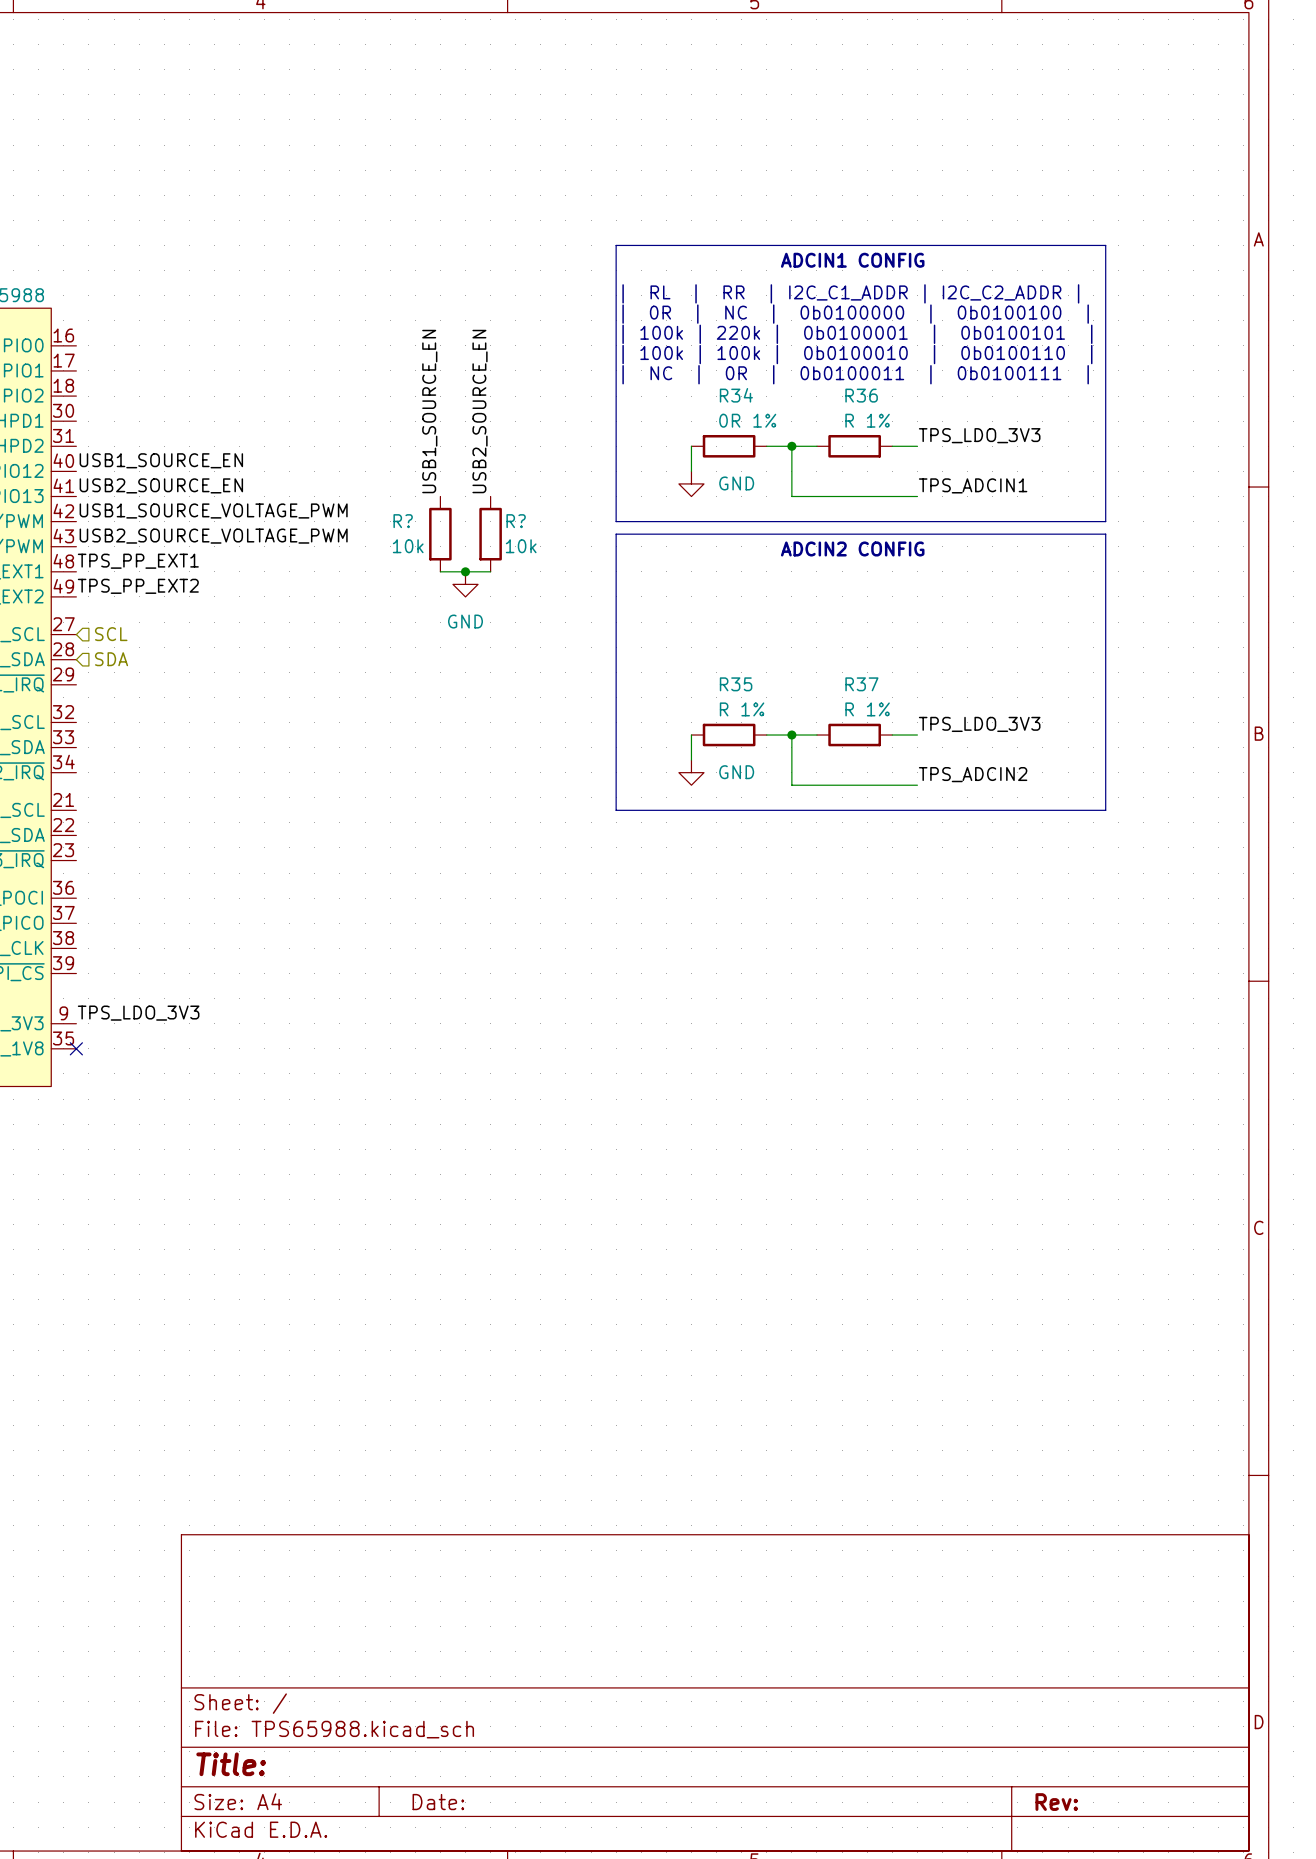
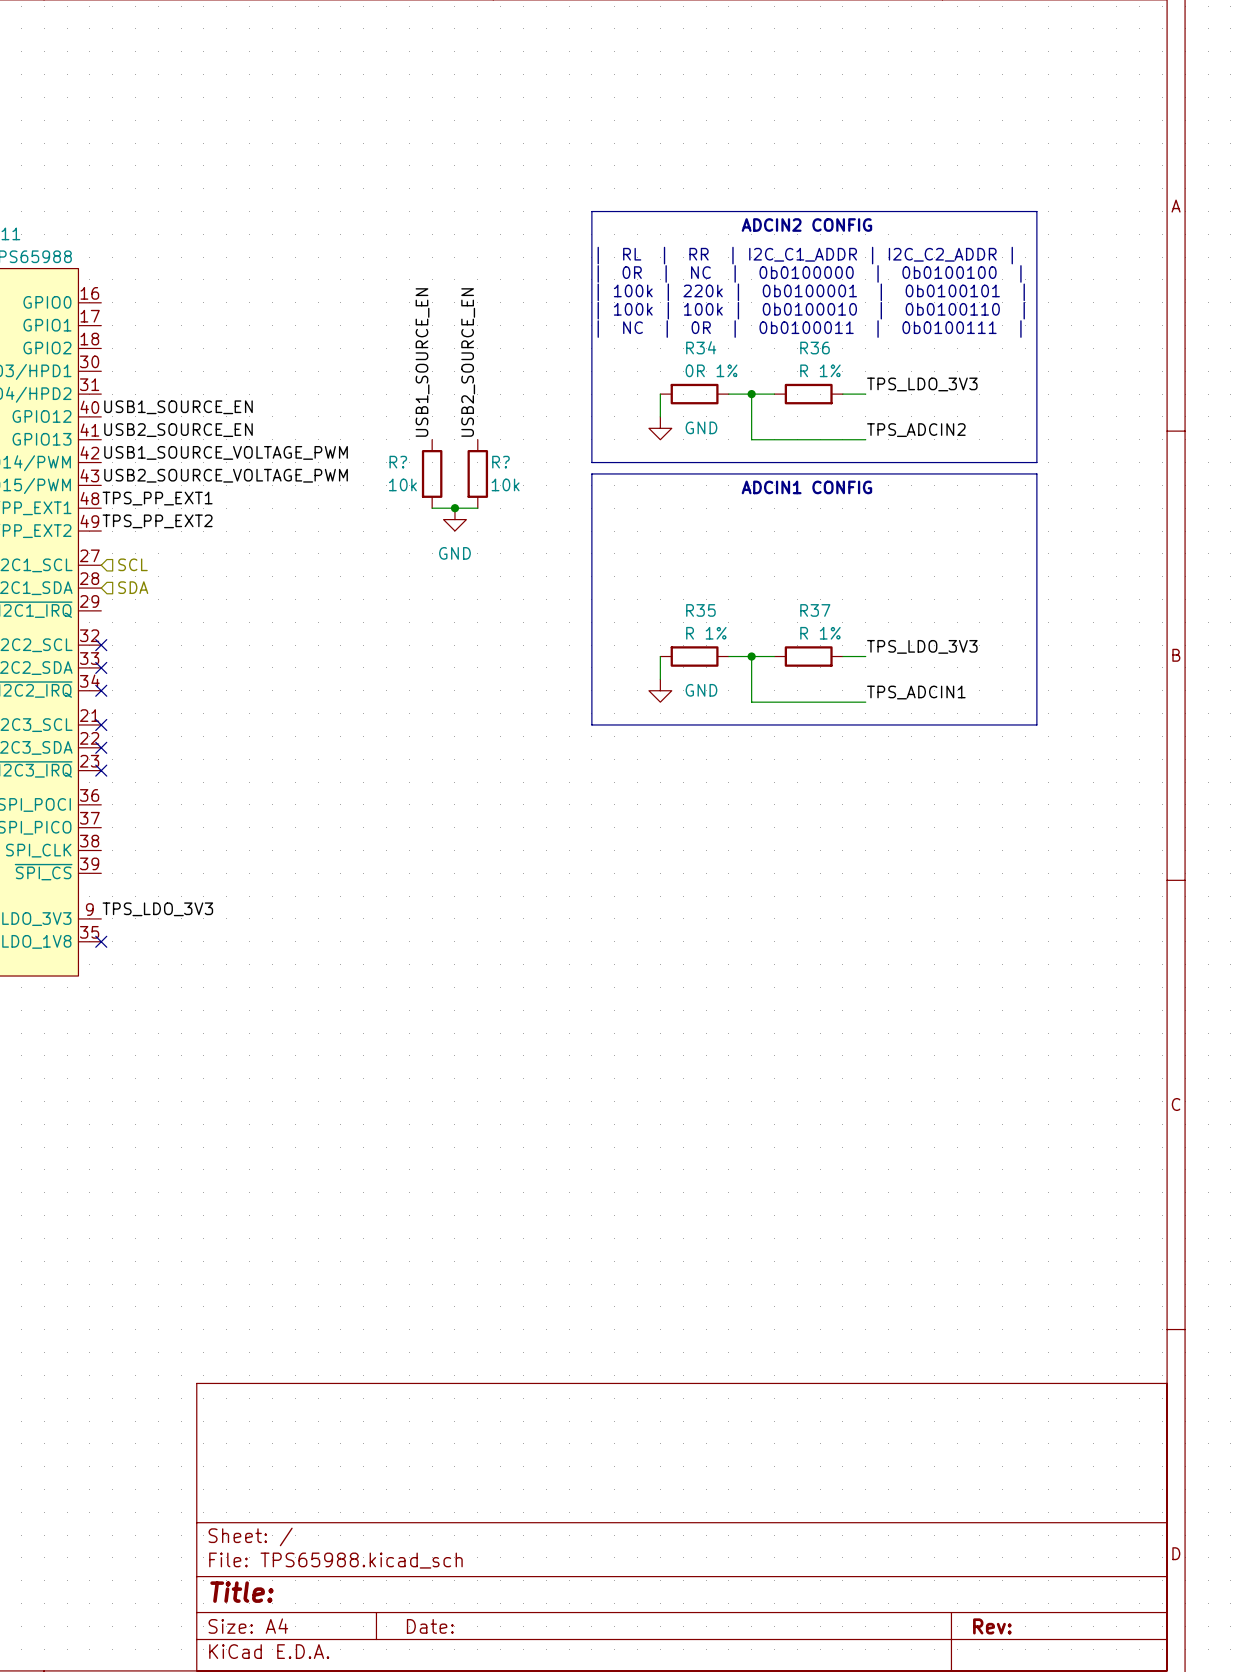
text: ADCIN1 CONFIG (852, 260) -> ADCIN2 CONFIG (806, 225)
label: TPS_ADCIN1 (973, 485) -> TPS_ADCIN2 (916, 430)
text: ADCIN2 CONFIG (852, 548) -> ADCIN1 CONFIG (806, 487)
no-connect mark: none -> (101, 645)
no-connect mark: none -> (101, 667)
no-connect mark: none -> (101, 690)
label: TPS_ADCIN2 (973, 774) -> TPS_ADCIN1 (916, 692)
no-connect mark: none -> (101, 724)
no-connect mark: none -> (101, 747)
no-connect mark: none -> (101, 770)

